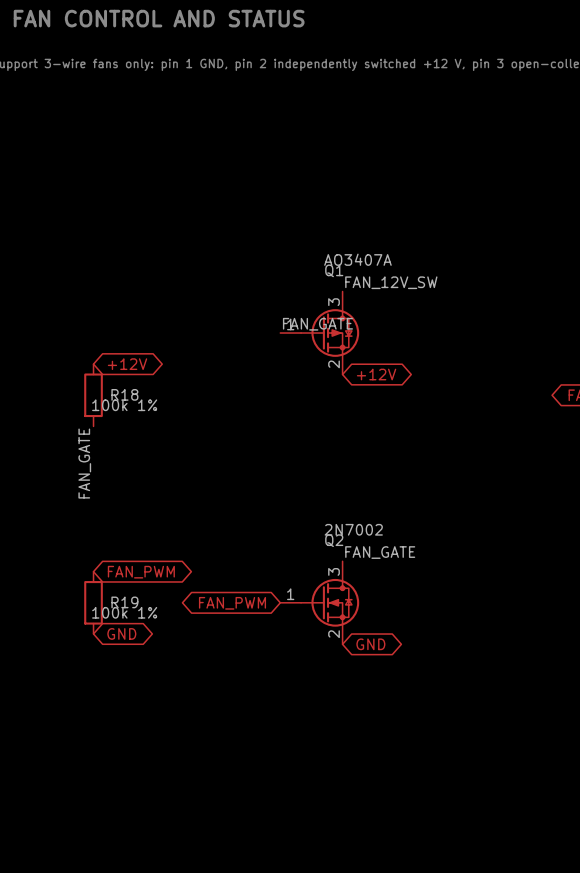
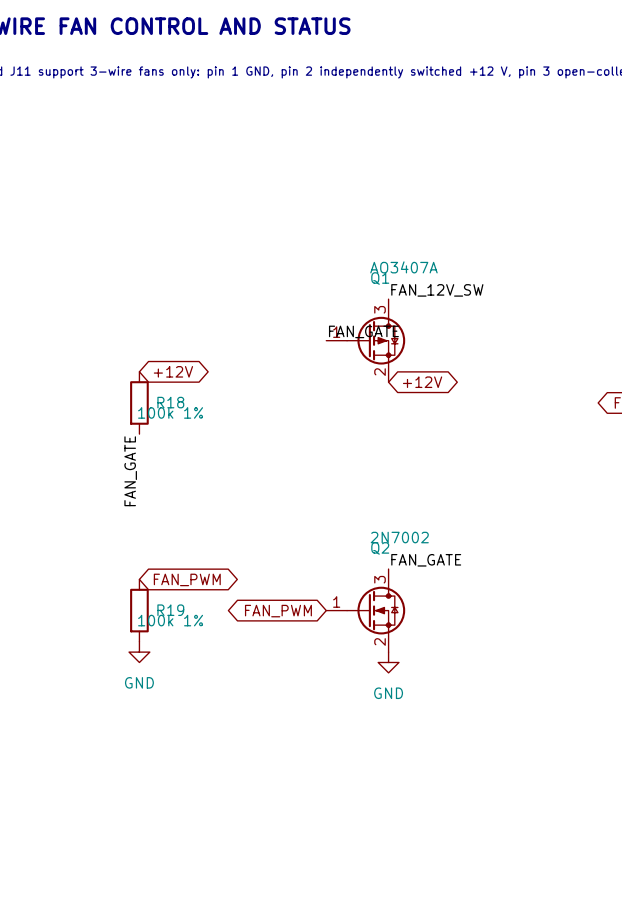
global label: GND (121, 633) -> none
power symbol: none -> GND (139, 652)
global label: GND (370, 644) -> none
power symbol: none -> GND (388, 662)

